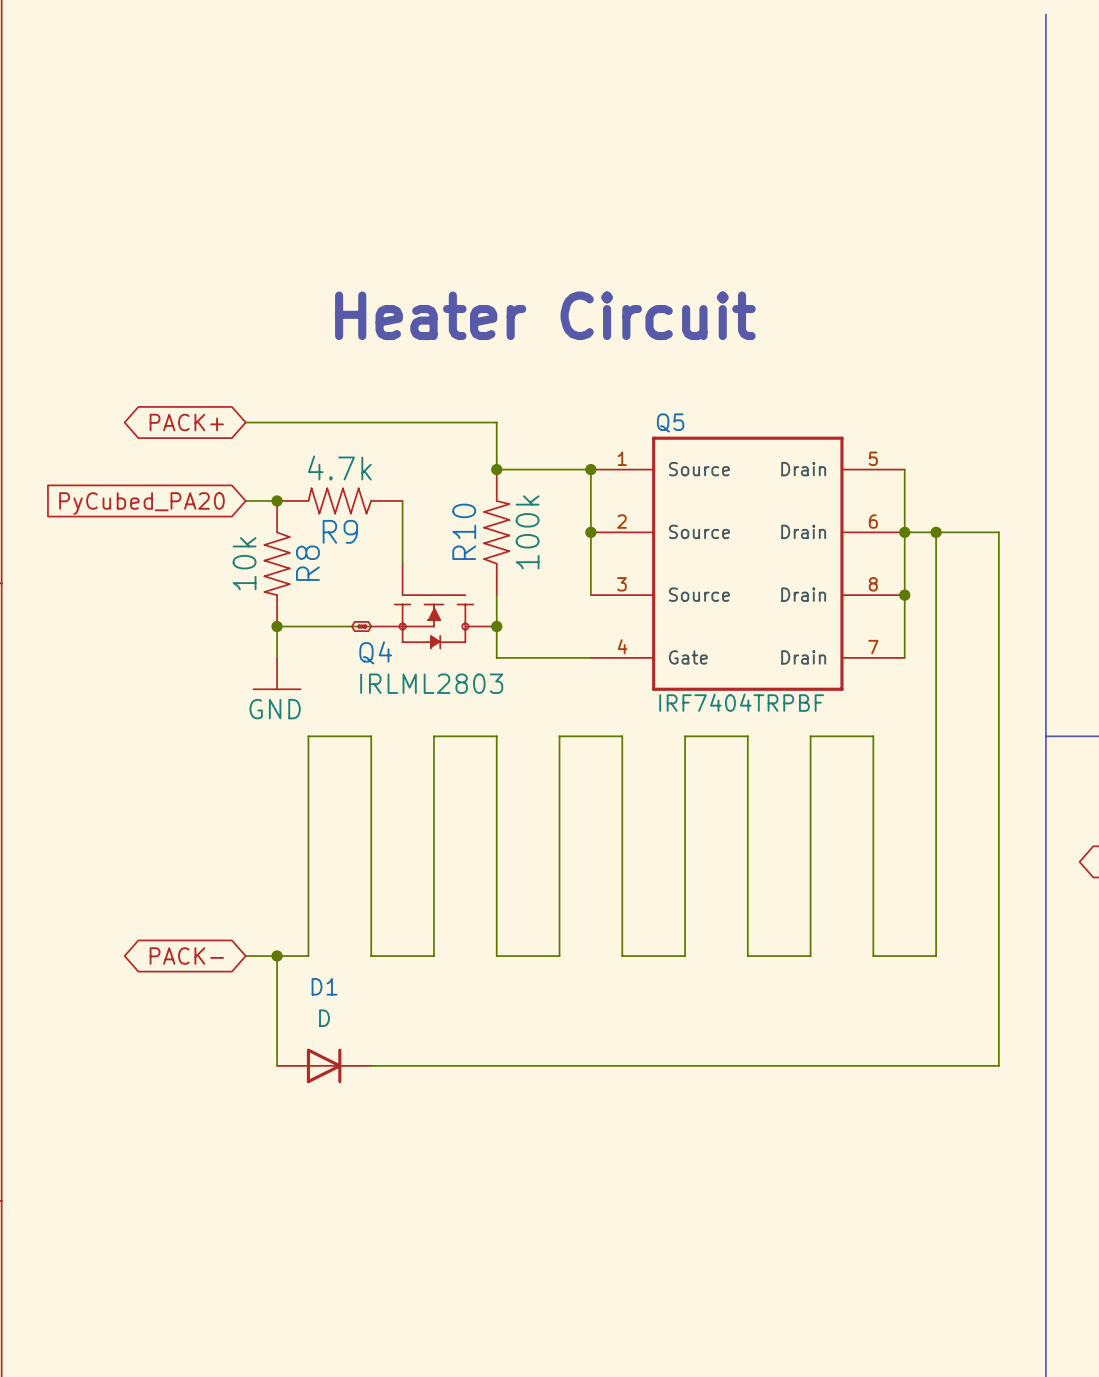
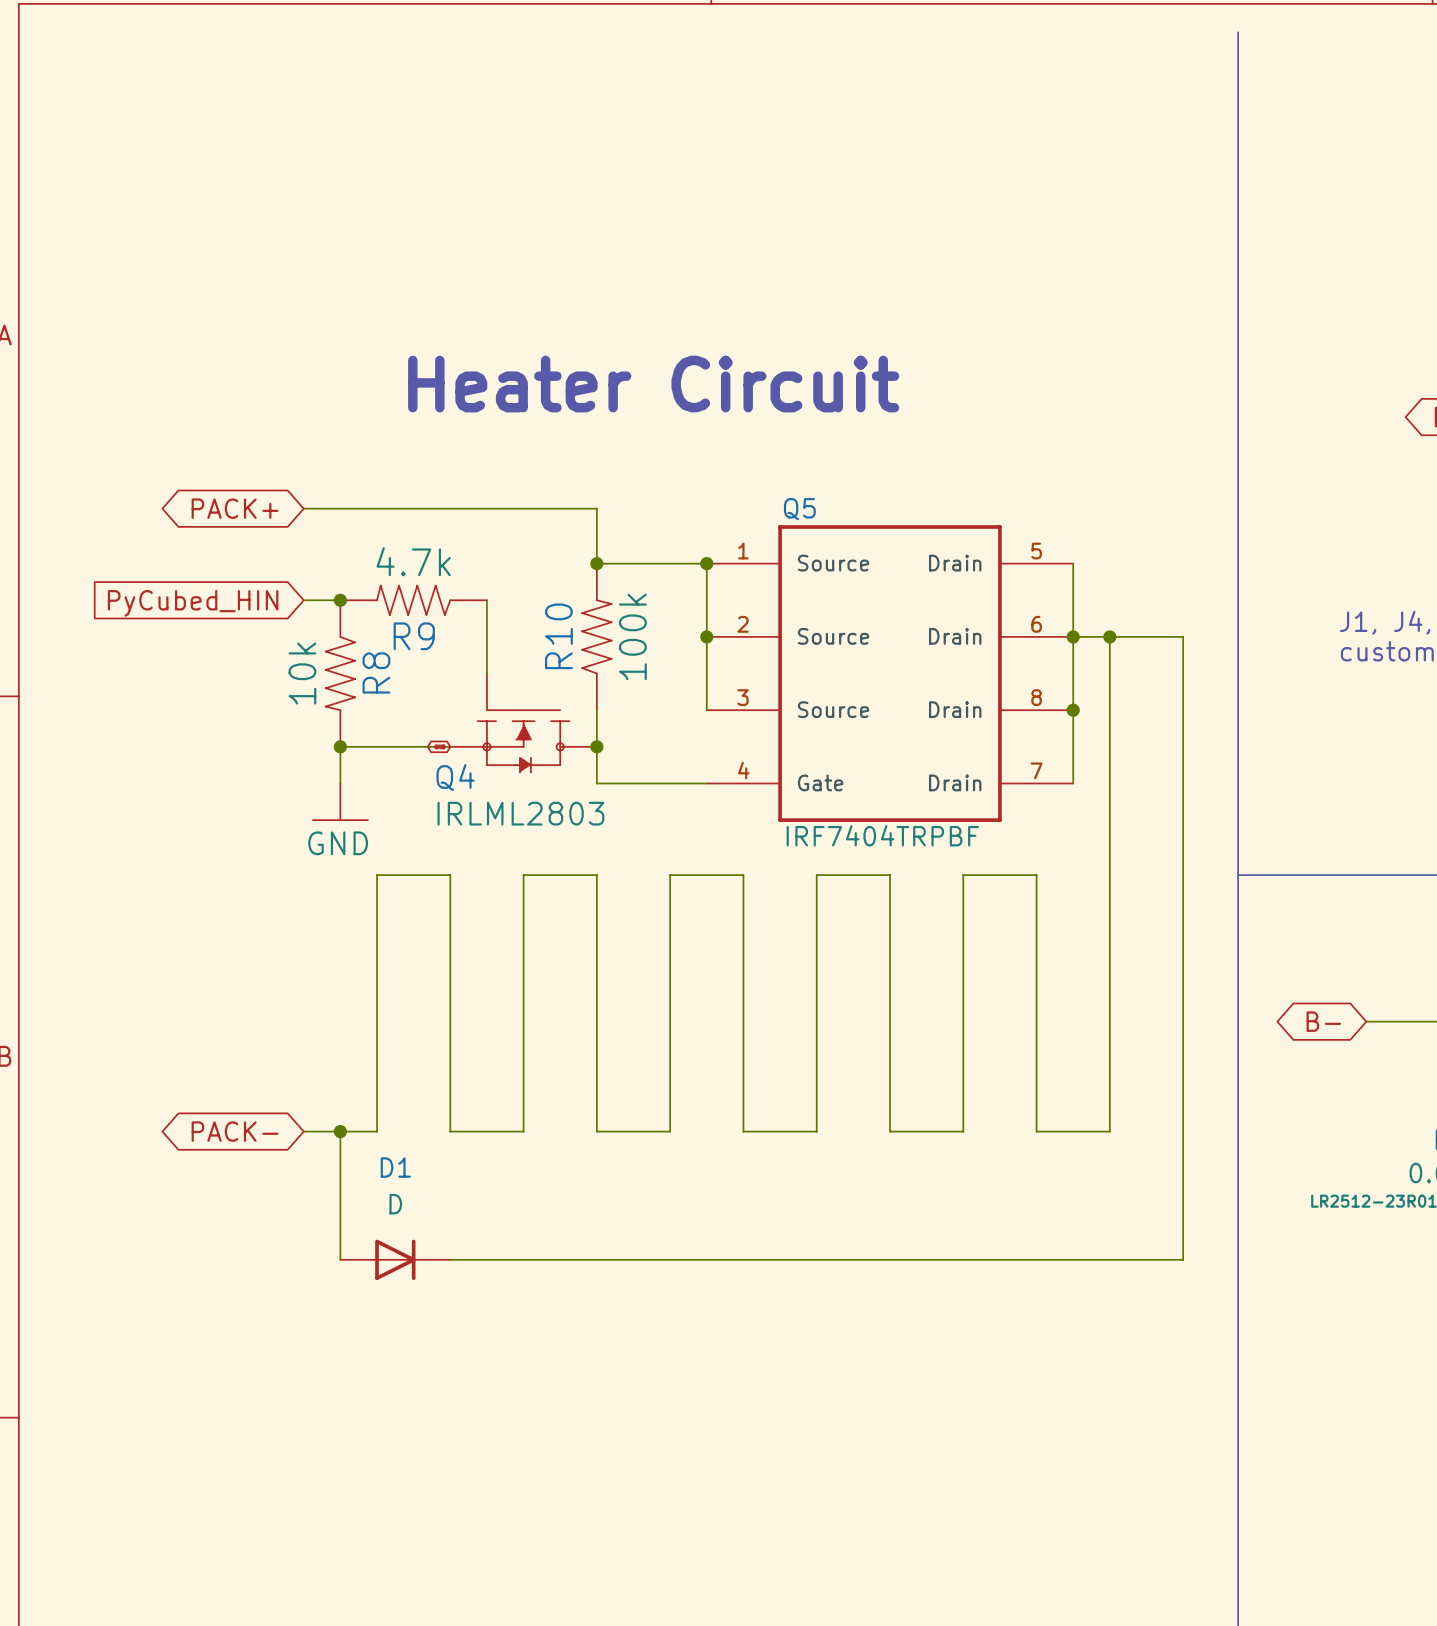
global label: PyCubed_PA20 (141, 503) -> PyCubed_HIN (193, 603)

